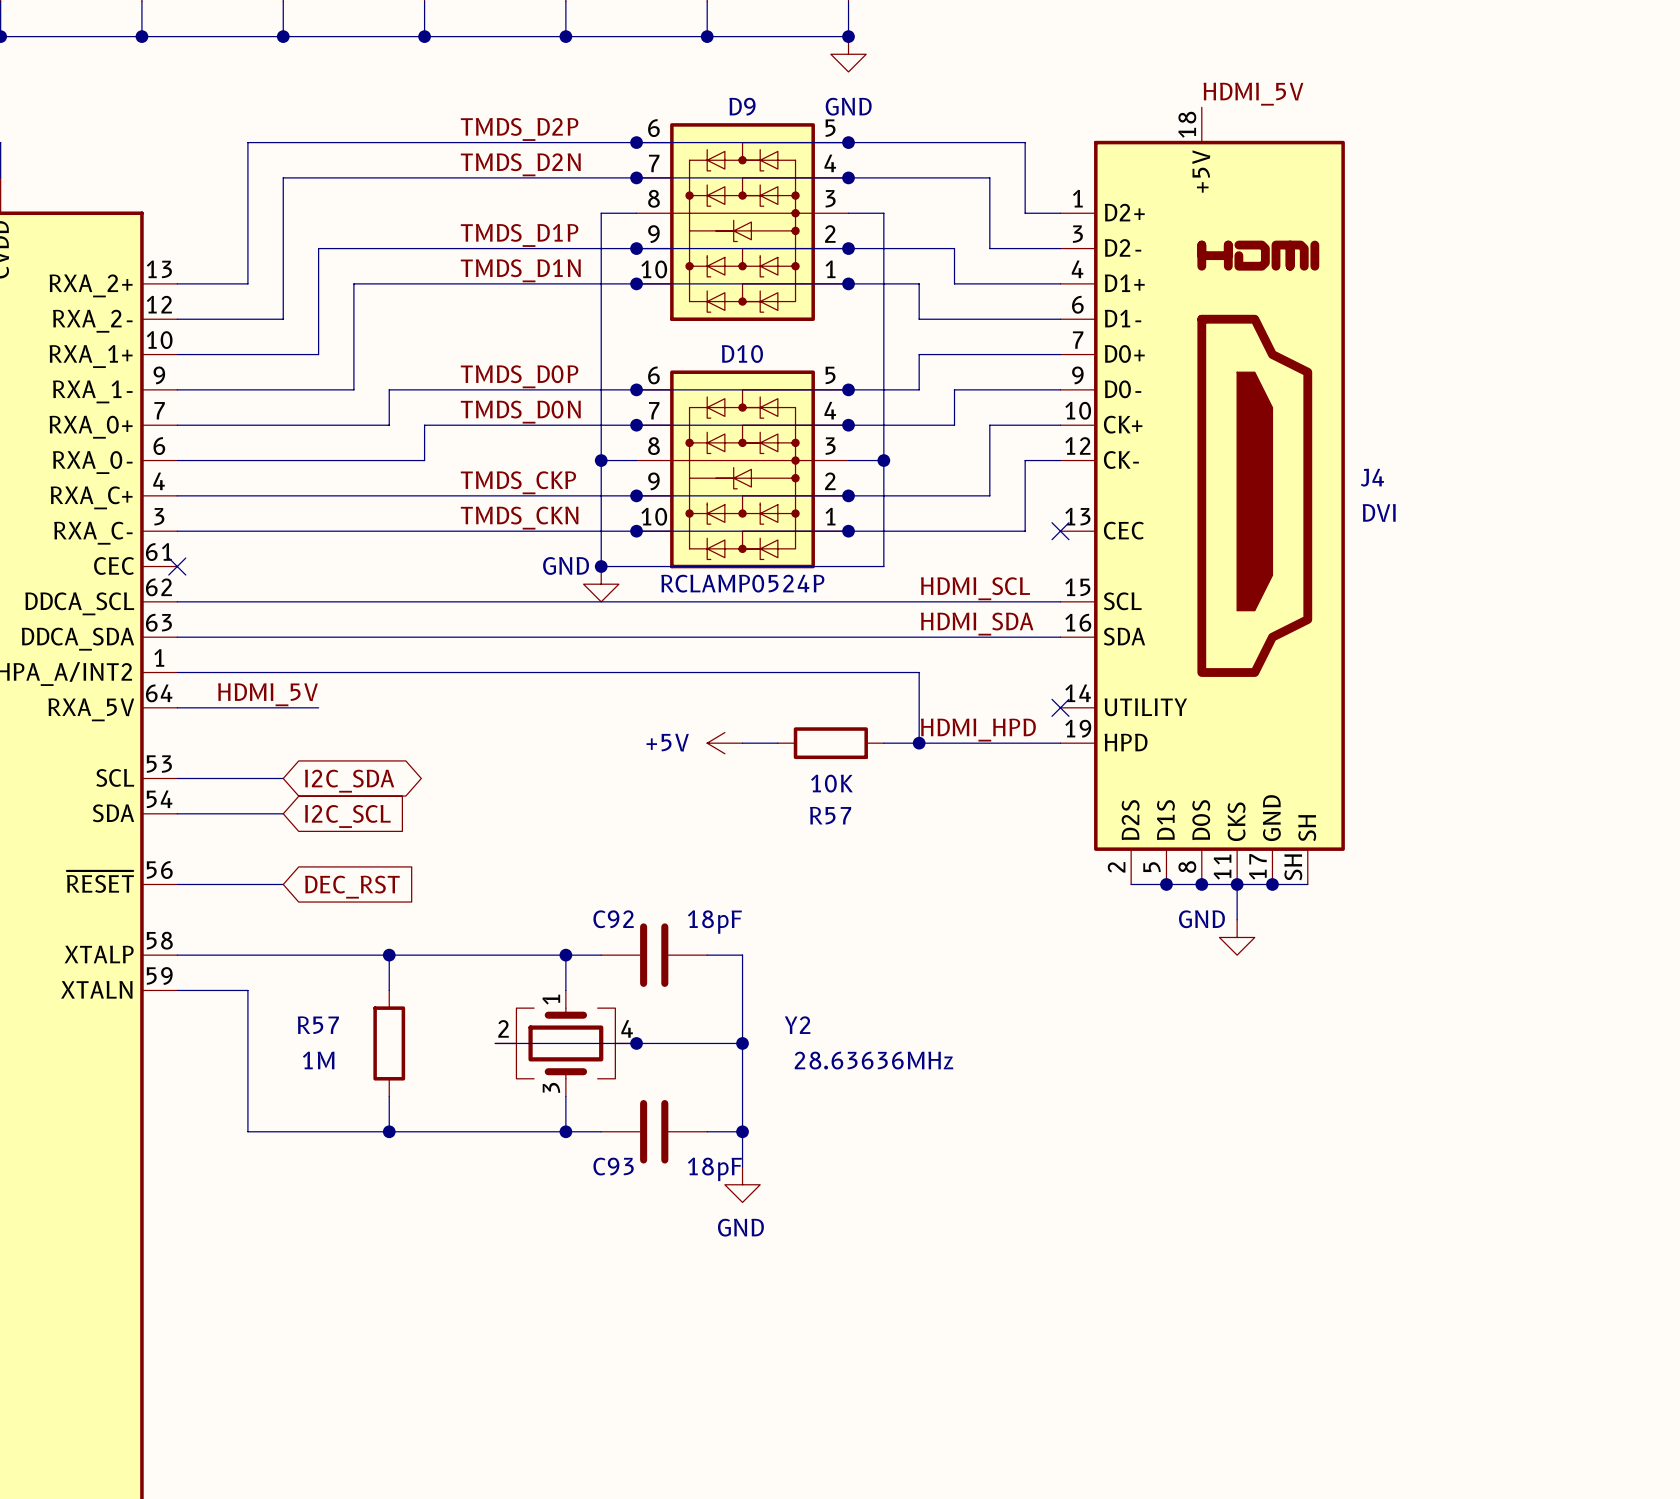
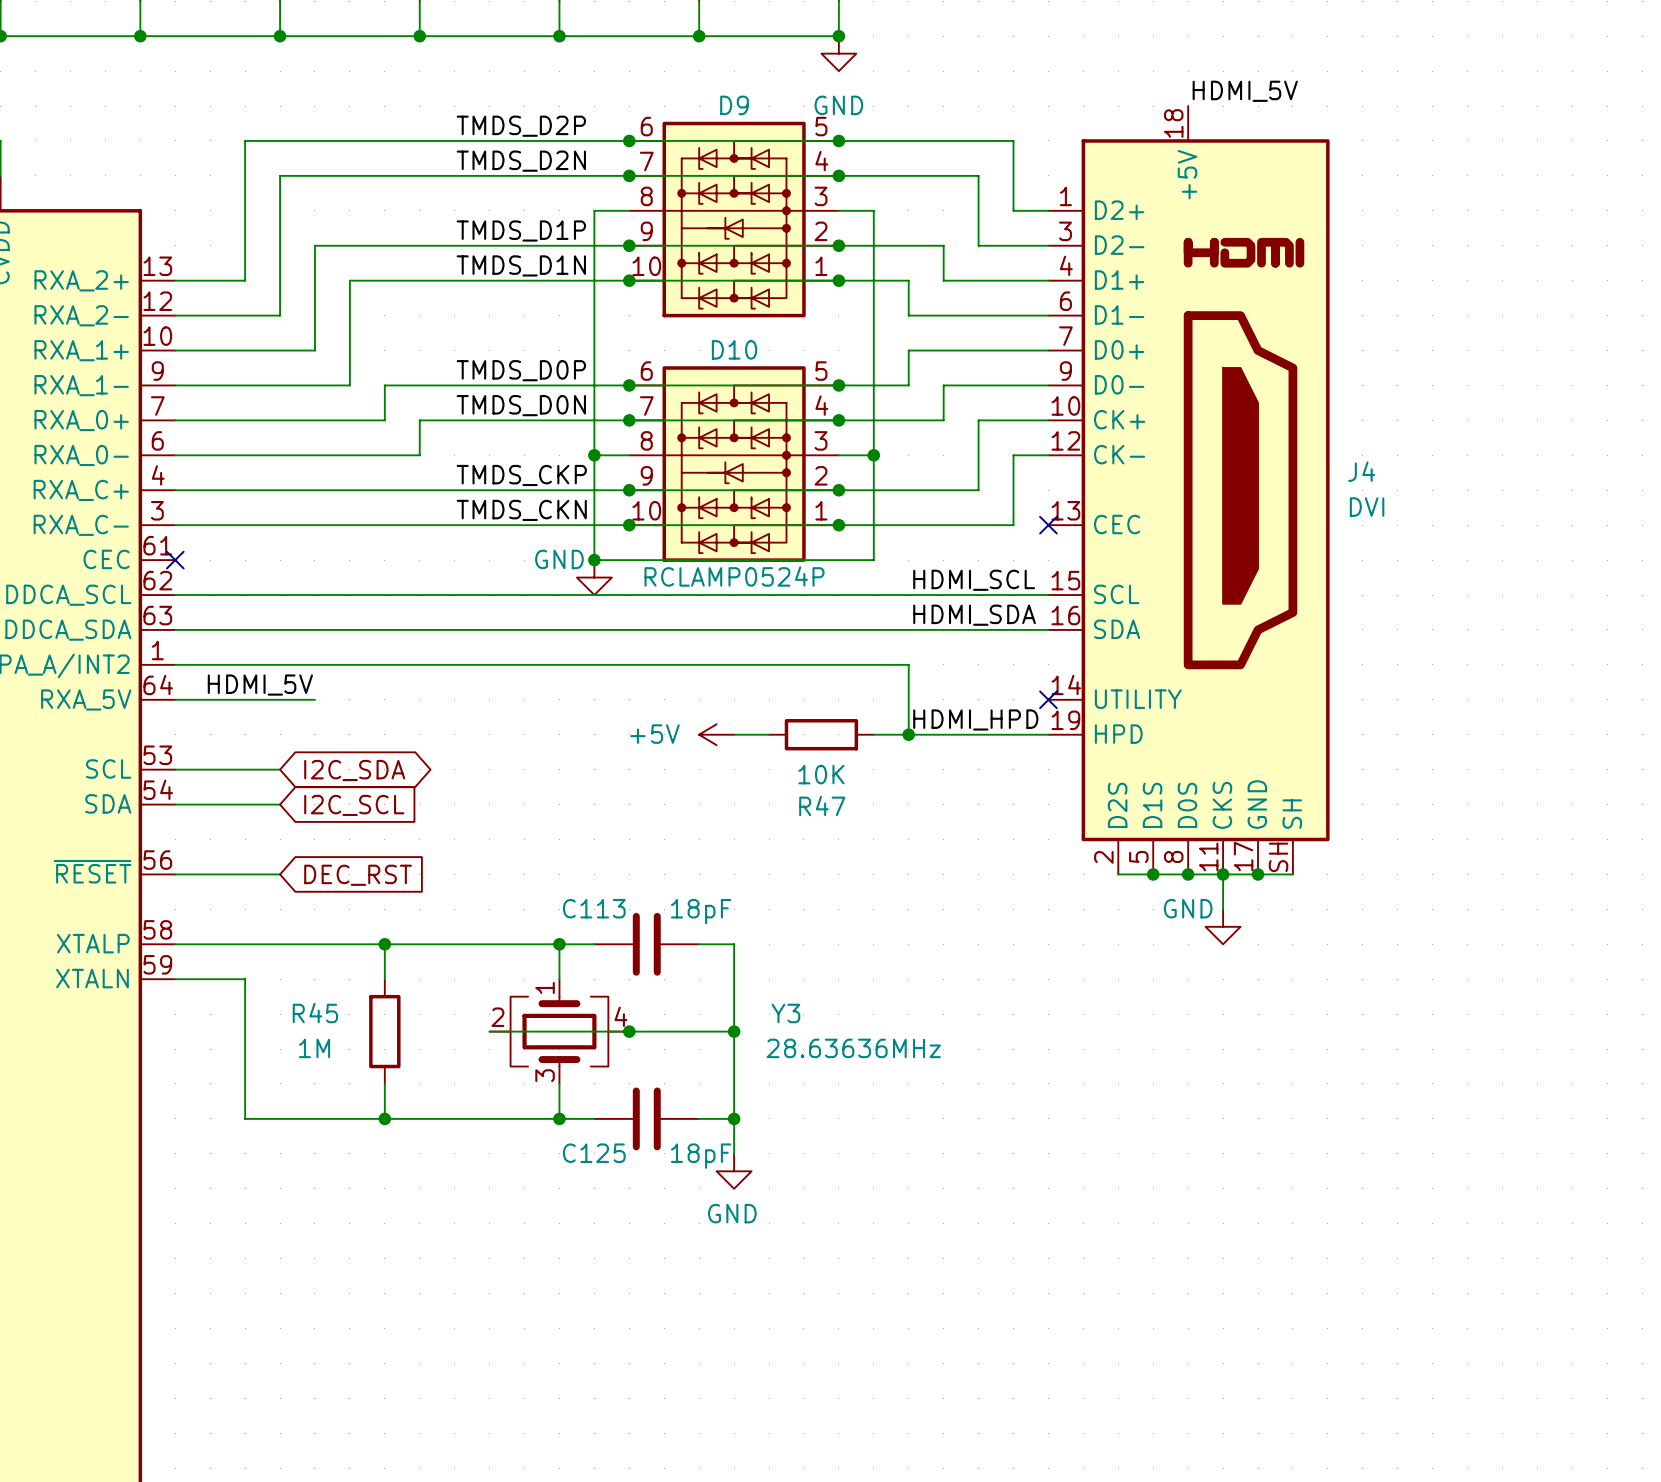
R57 name: R57 (830, 815) -> R47 (822, 805)
C92 name: C92 (613, 919) -> C113 (594, 908)
R57 name: R57 (318, 1025) -> R45 (315, 1013)
Y2 name: Y2 (797, 1025) -> Y3 (785, 1013)
C93 name: C93 (613, 1166) -> C125 (594, 1153)

